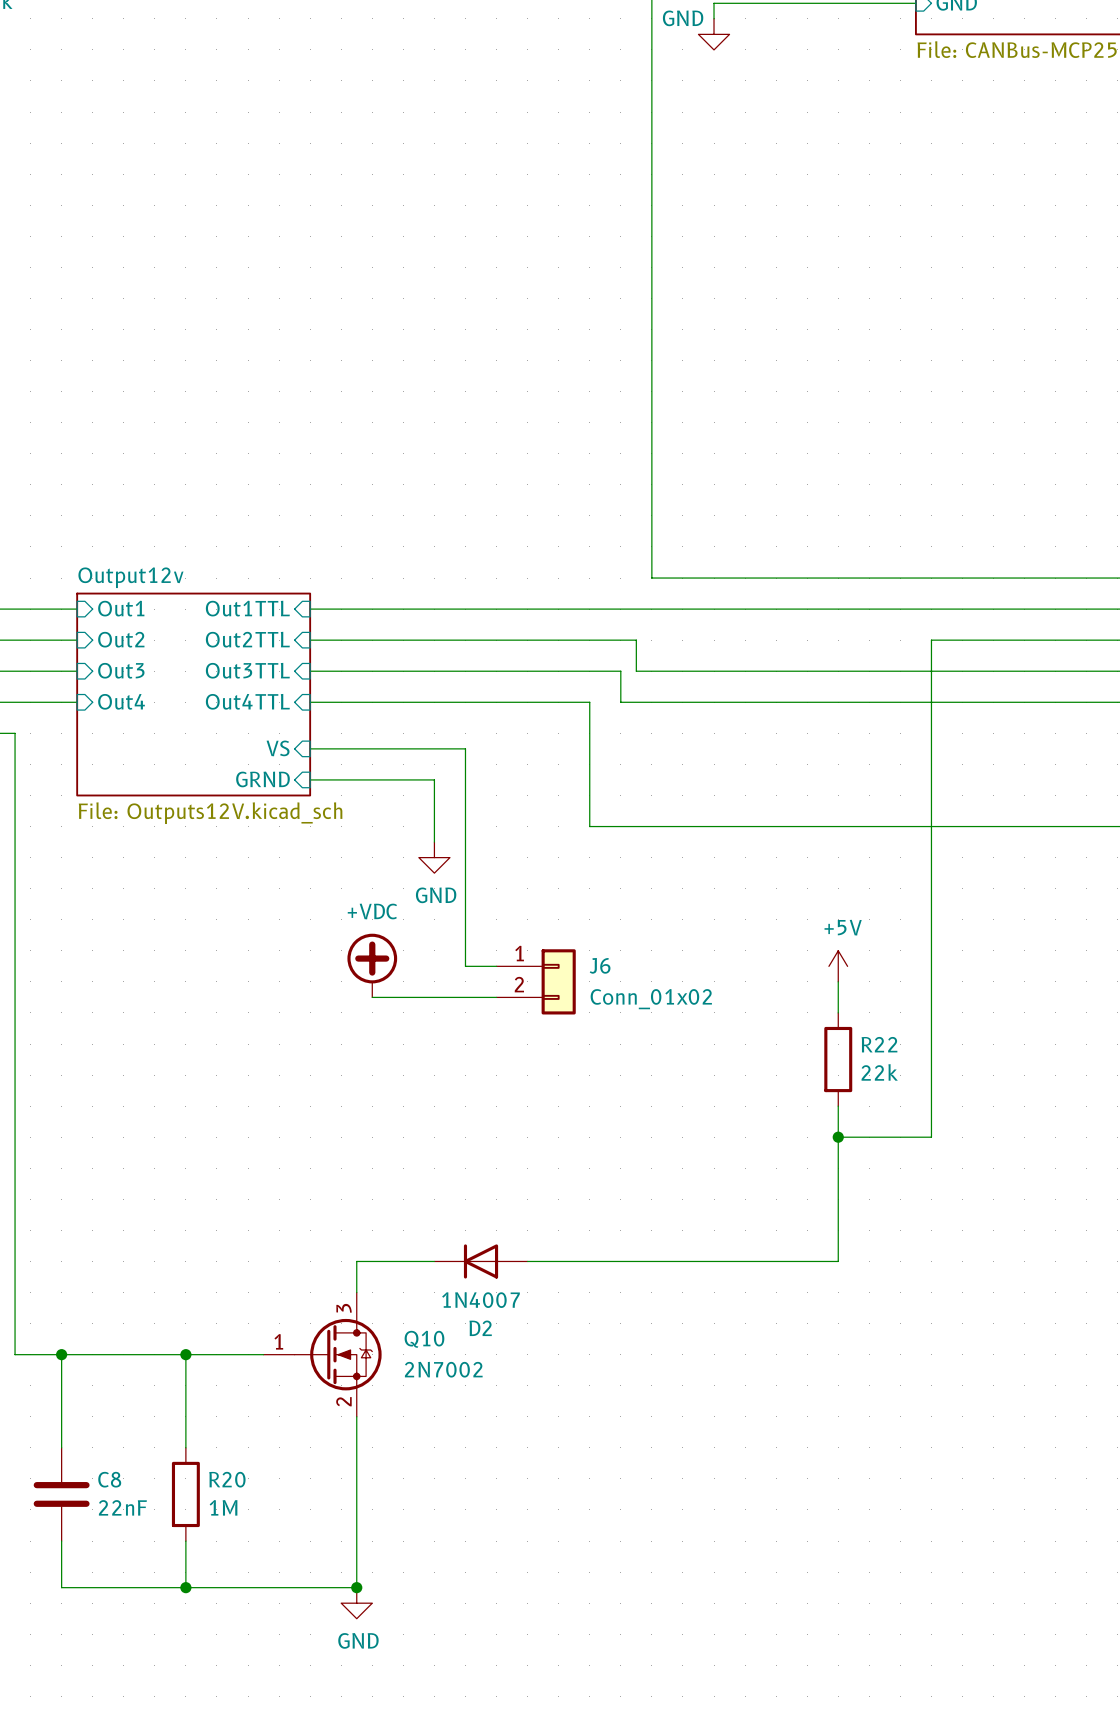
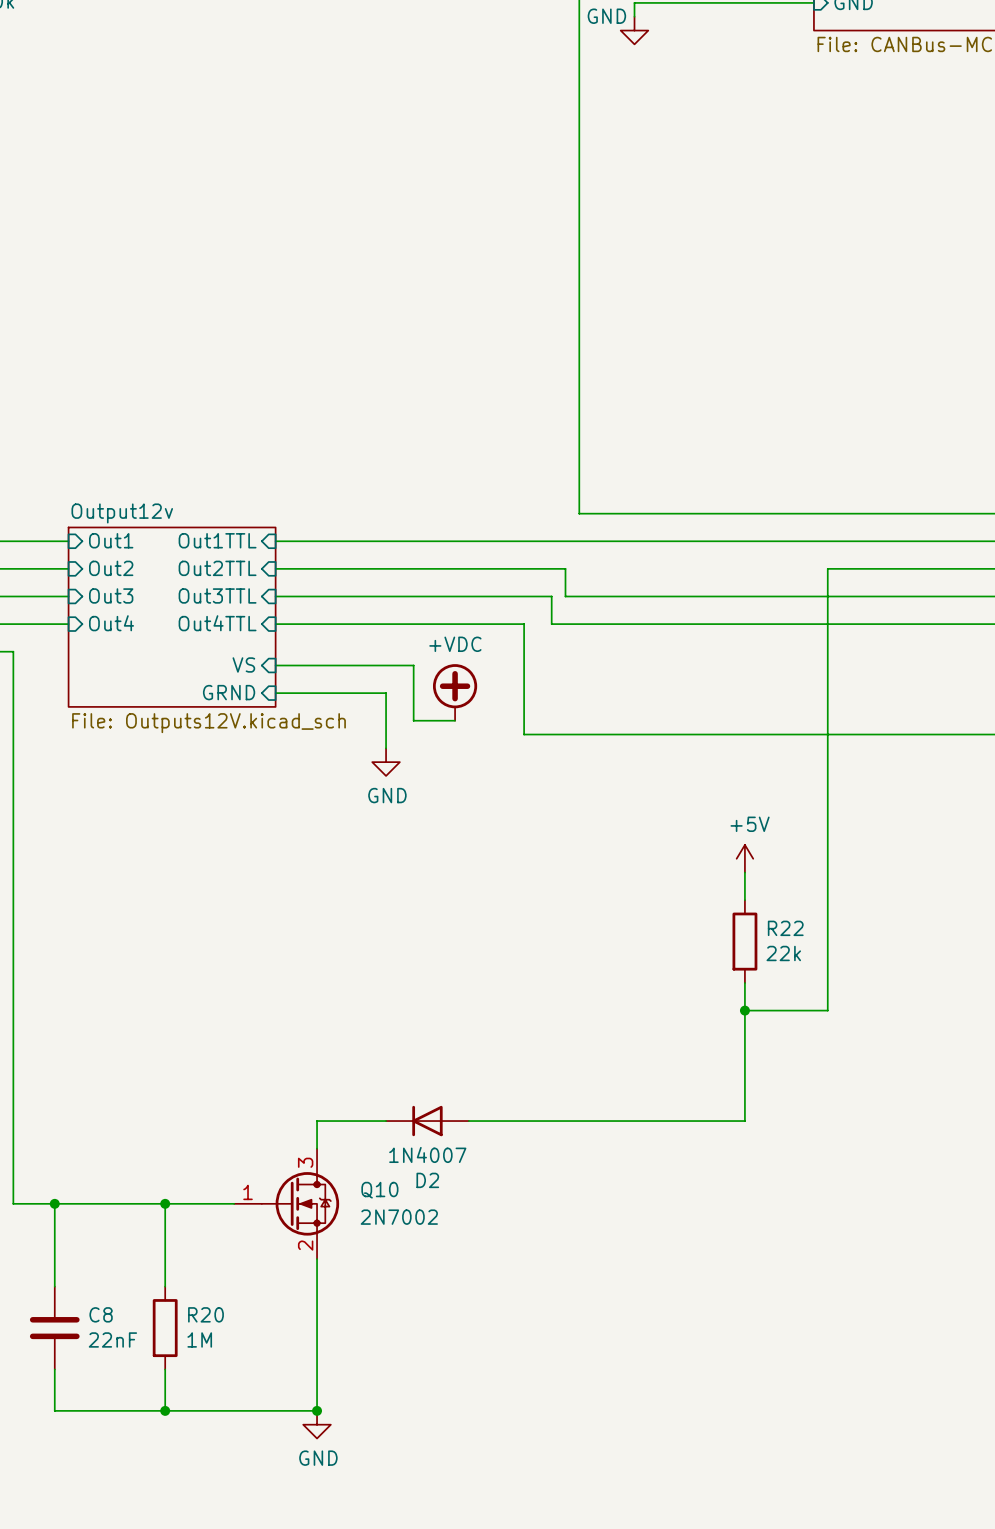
wire: (465, 811) (465, 966) (496, 966) -> (413, 720) (455, 720)
power symbol position: +VDC (372, 965) -> +VDC (455, 692)
J6: Conn_01x02 (536, 981) -> none
wire: (372, 997) (496, 997) -> none

